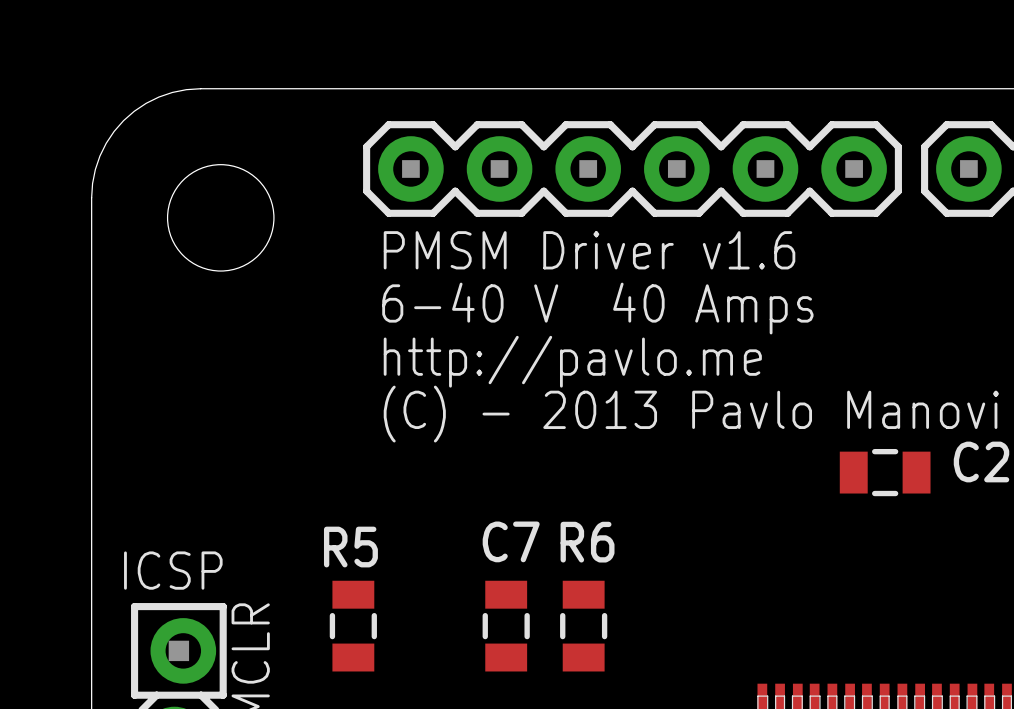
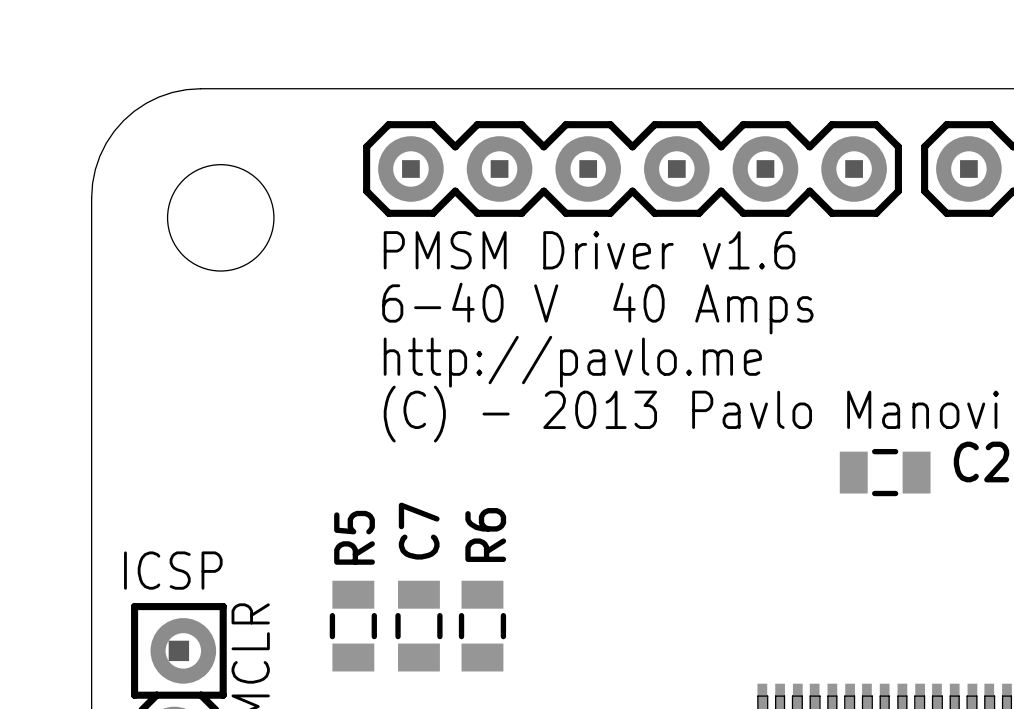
C7 name rotation: 0° (511, 541) -> 90° counterclockwise (419, 531)
R6 name rotation: 0° (587, 542) -> 90° counterclockwise (485, 535)
R5 name rotation: 0° (350, 547) -> 90° counterclockwise (354, 537)
C7 position: (506, 626) -> (418, 626)
R6 position: (583, 626) -> (482, 626)

